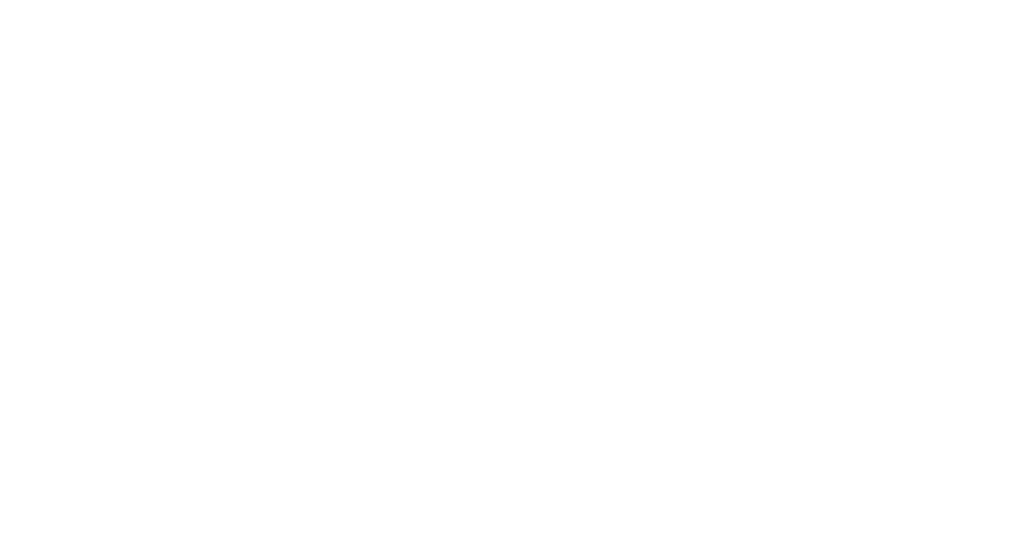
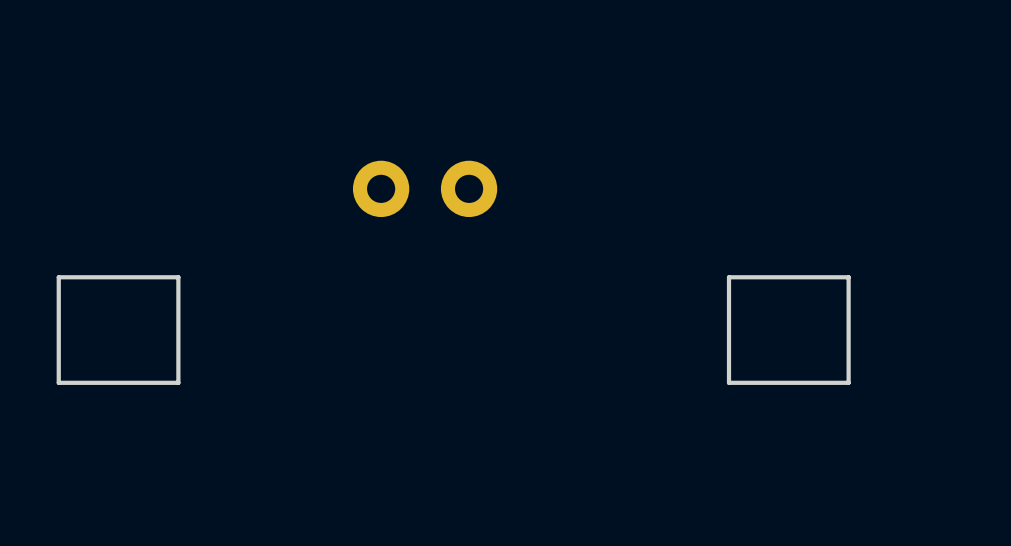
part: none -> (425, 188)
part: none -> (118, 330)
part: none -> (788, 330)

